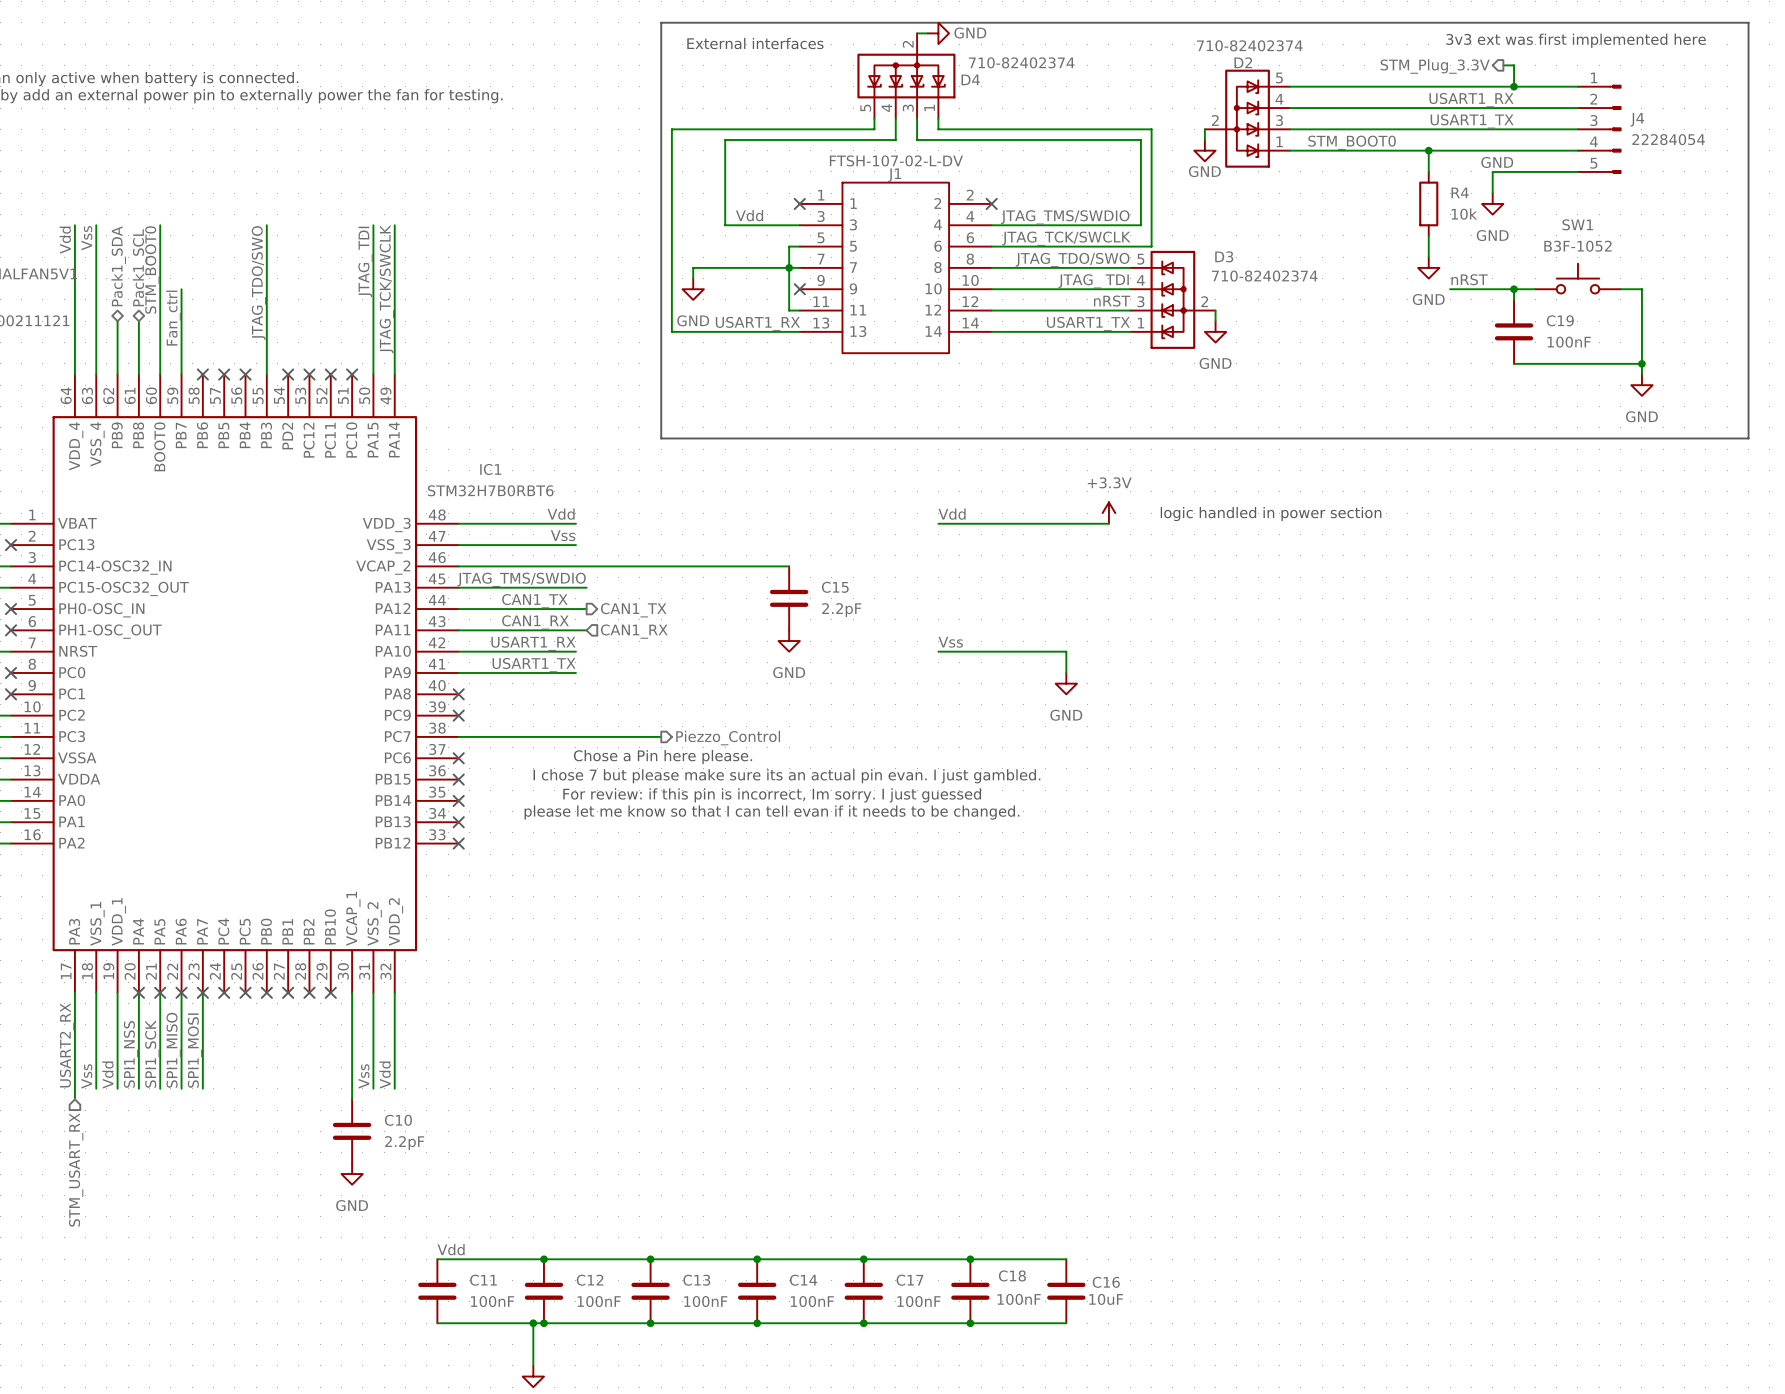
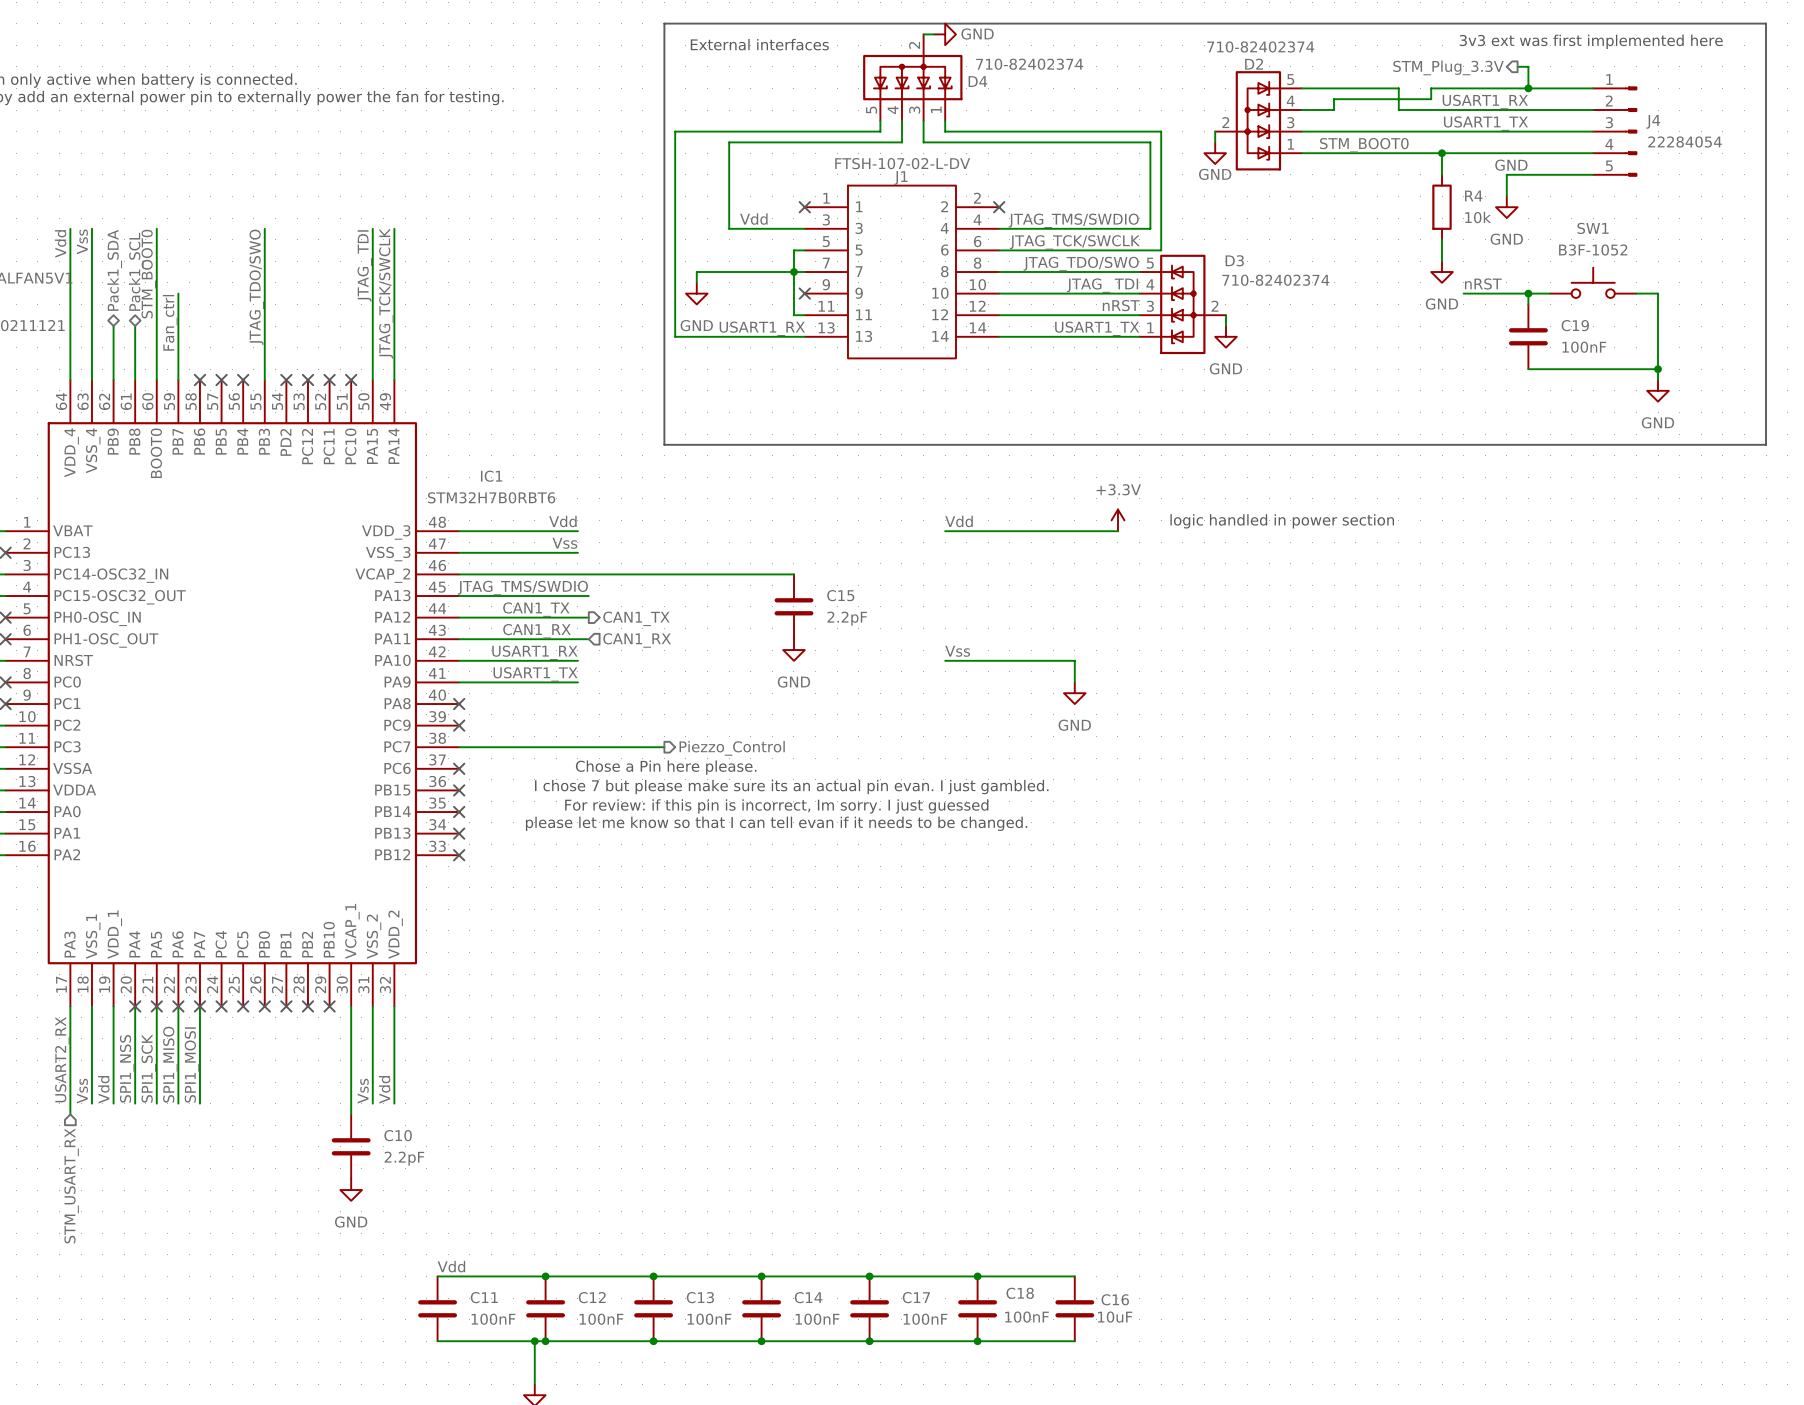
wire: (1386, 86) (1418, 86) -> (1398, 88) (1398, 110)
wire: (1322, 108) (1386, 108) -> (1334, 110) (1334, 99) (1431, 99) (1431, 88)

